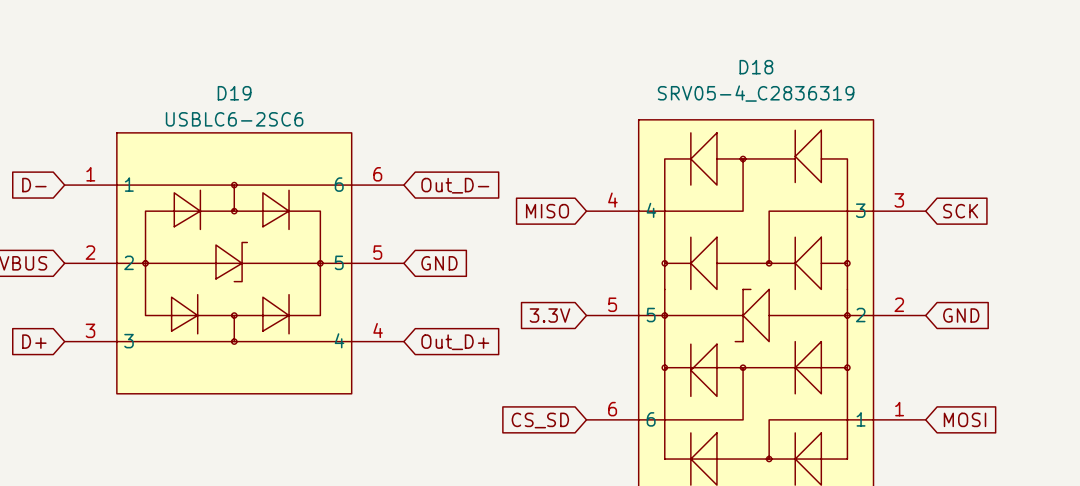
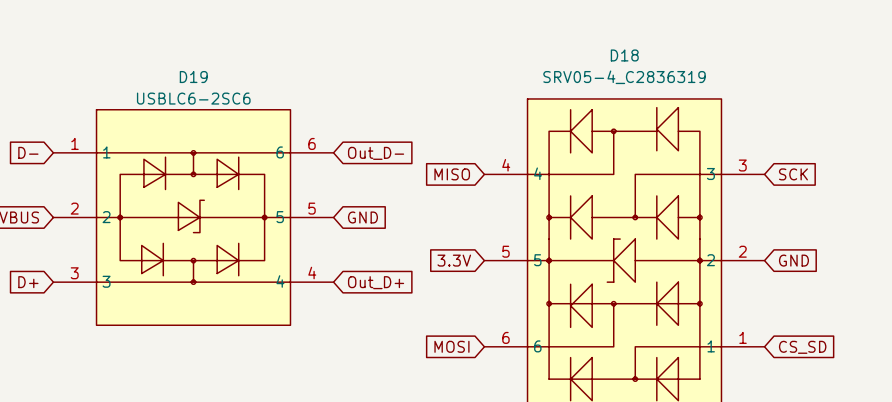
global label: MOSI (965, 419) -> CS_SD (802, 347)
global label: CS_SD (540, 420) -> MOSI (451, 346)

